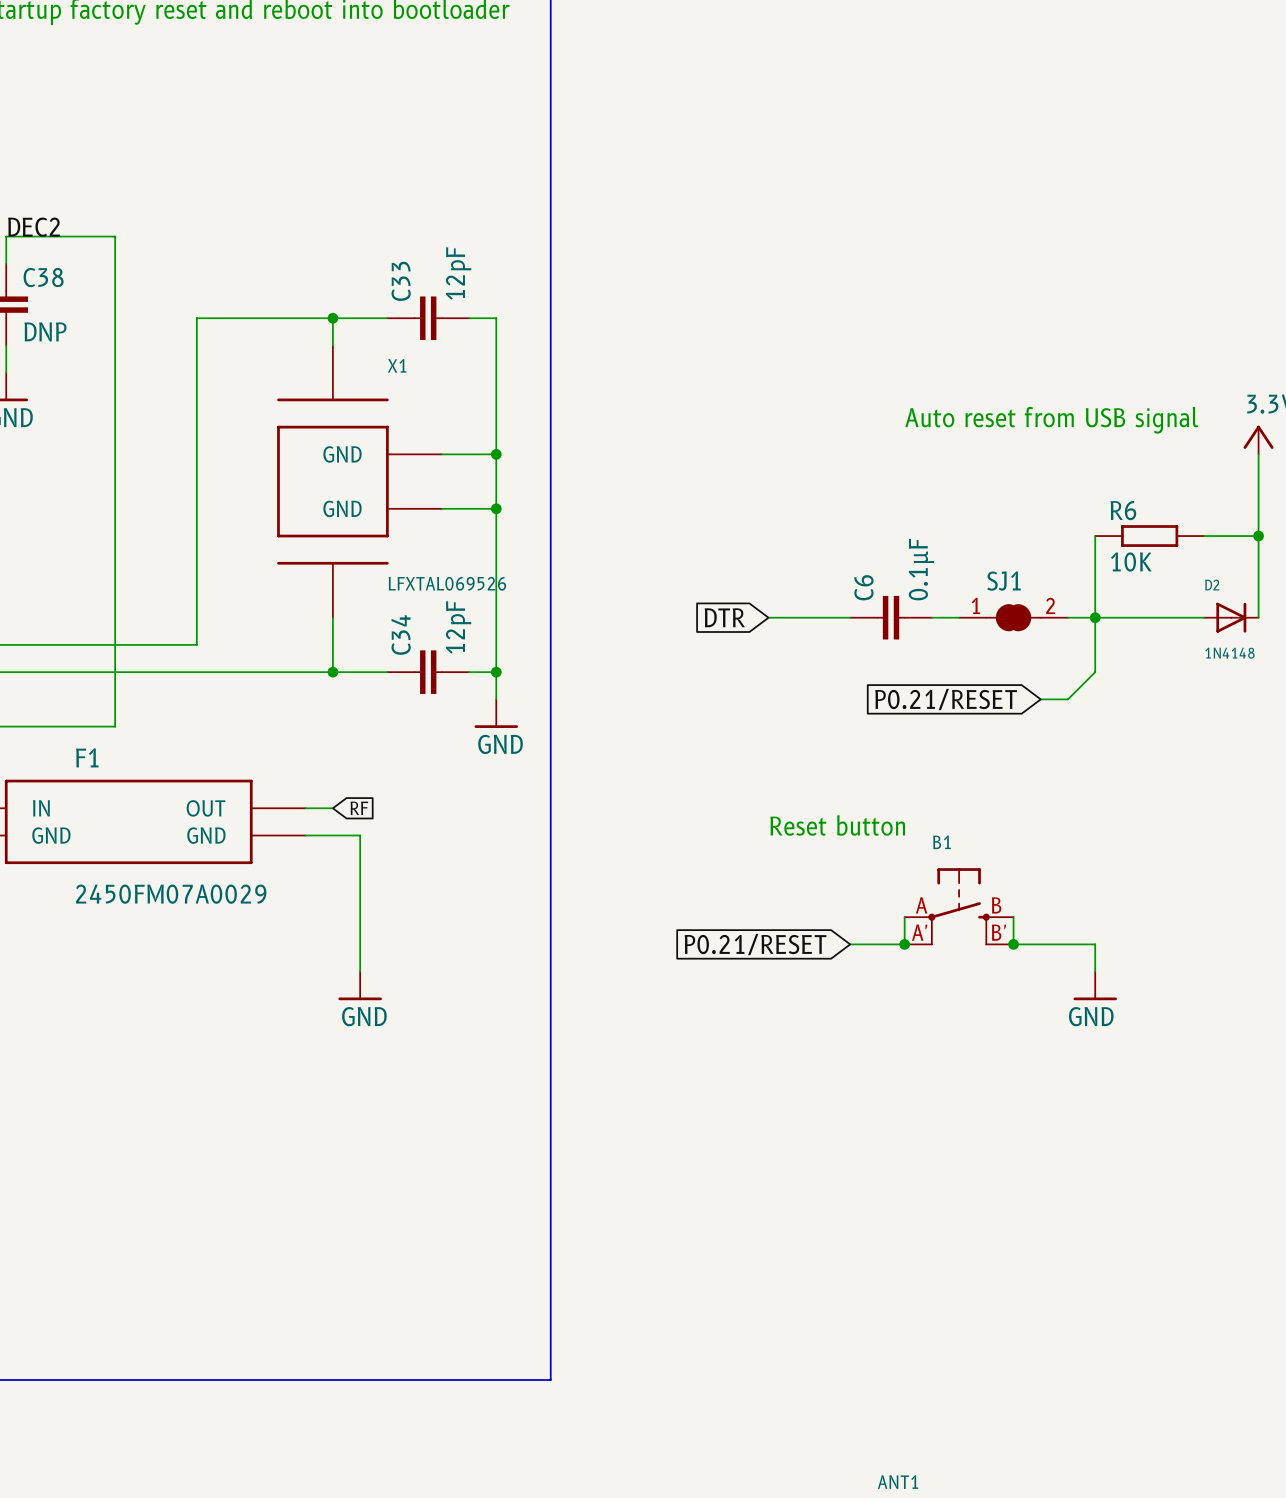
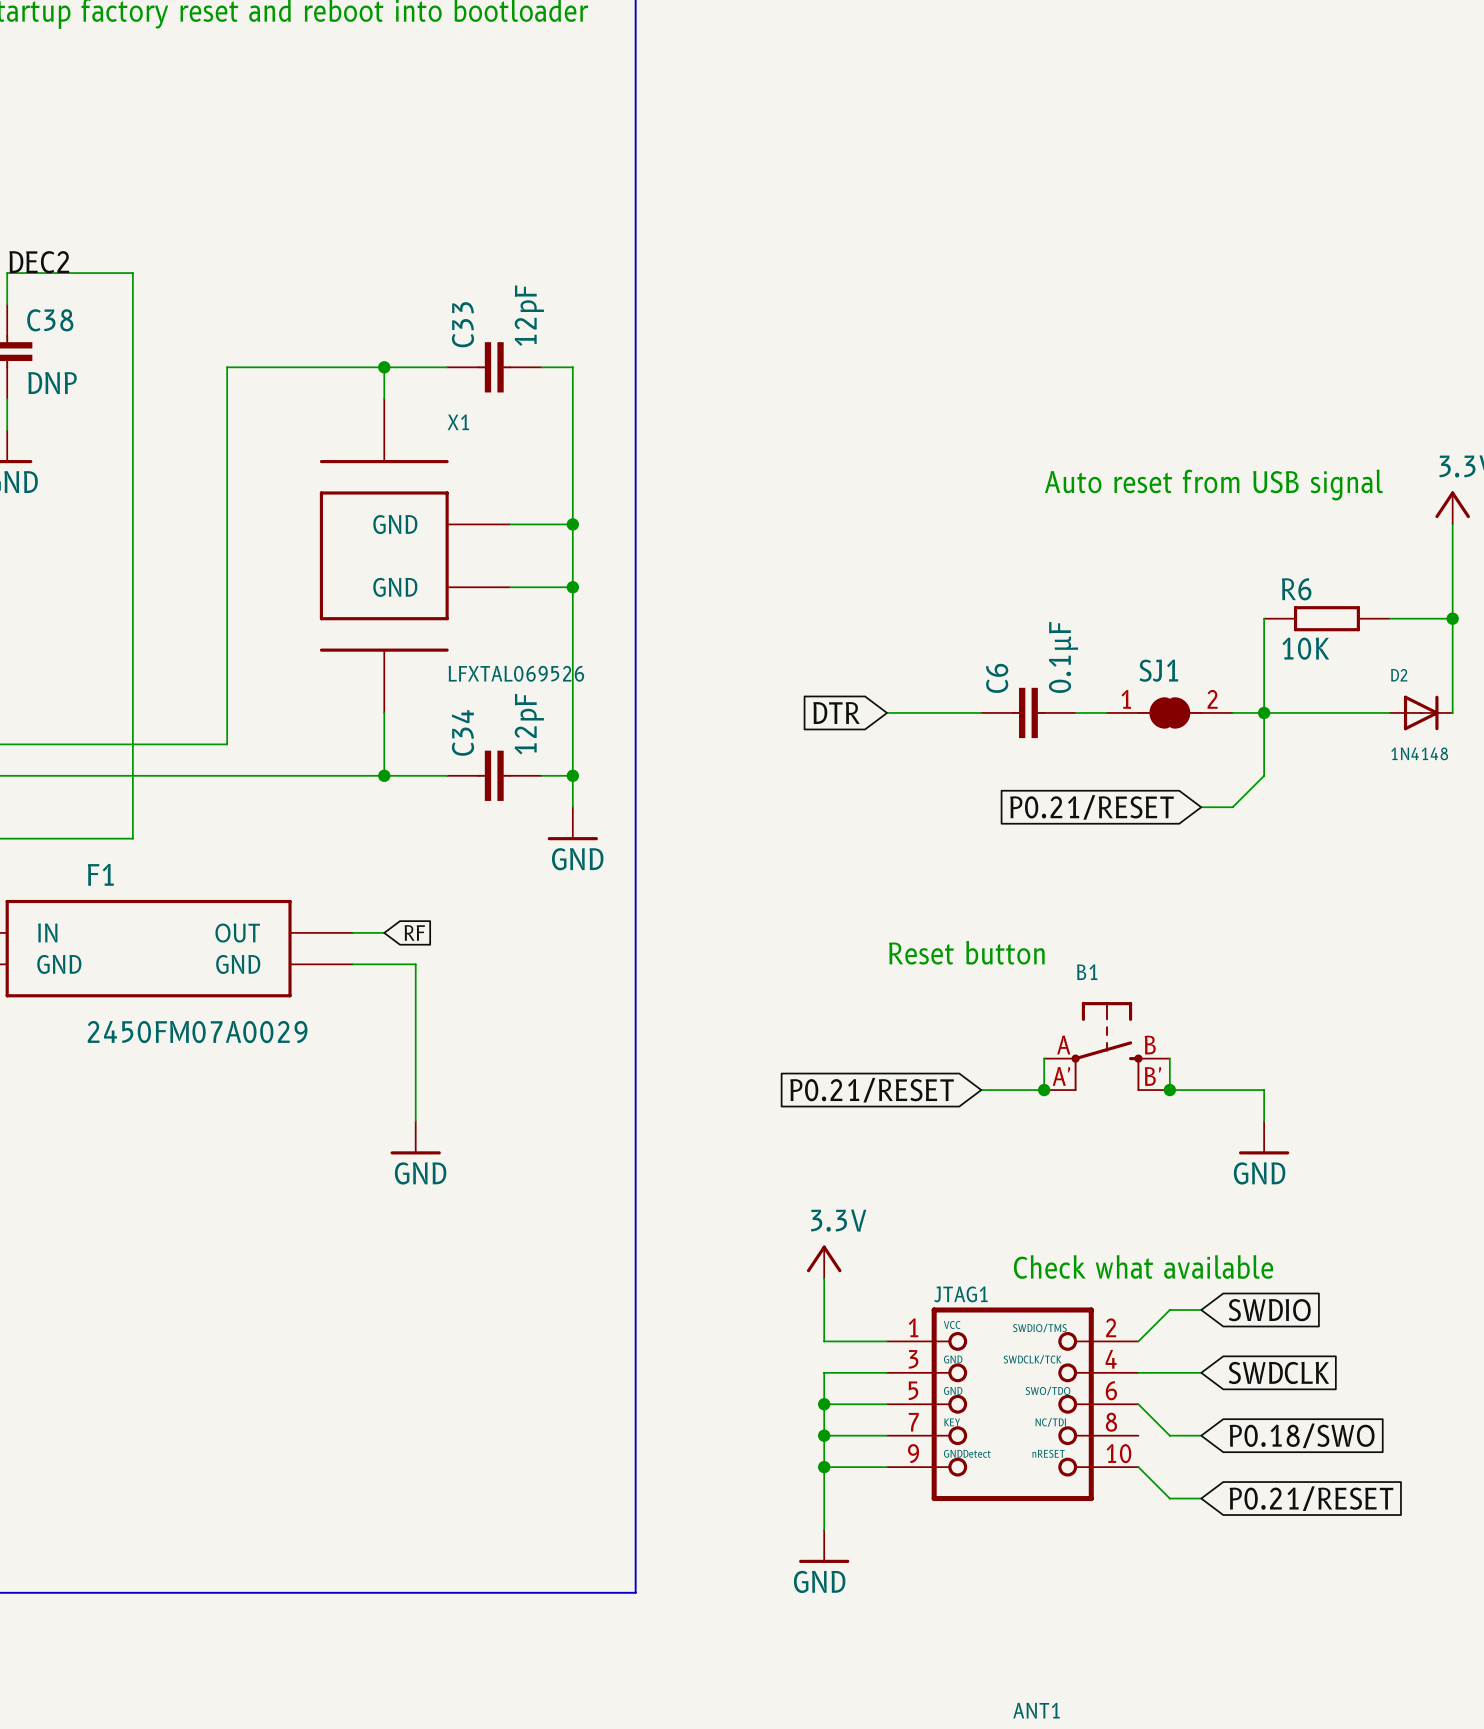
power symbol: none -> 3.3V (824, 1262)
text: none -> Check what available (1143, 1267)
wire: none -> (824, 1278) (824, 1341) (887, 1341)
wire: none -> (1201, 1310) (1169, 1310) (1138, 1341)
global label: none -> SWDIO (1269, 1310)
wire: none -> (887, 1372) (824, 1372) (824, 1529)
wire: none -> (1138, 1372) (1201, 1372)
global label: none -> SWDCLK (1278, 1372)
wire: none -> (824, 1404) (887, 1404)
junction: none -> (824, 1404)
JTAG1: none -> (1012, 1404)
wire: none -> (1138, 1404) (1169, 1435) (1201, 1435)
wire: none -> (824, 1435) (887, 1435)
junction: none -> (824, 1435)
global label: none -> P0.18/SWO (1302, 1435)
wire: none -> (824, 1467) (887, 1467)
junction: none -> (824, 1467)
wire: none -> (1138, 1467) (1169, 1498) (1201, 1498)
global label: none -> P0.21/RESET (1311, 1498)
power symbol: none -> GND (824, 1546)

